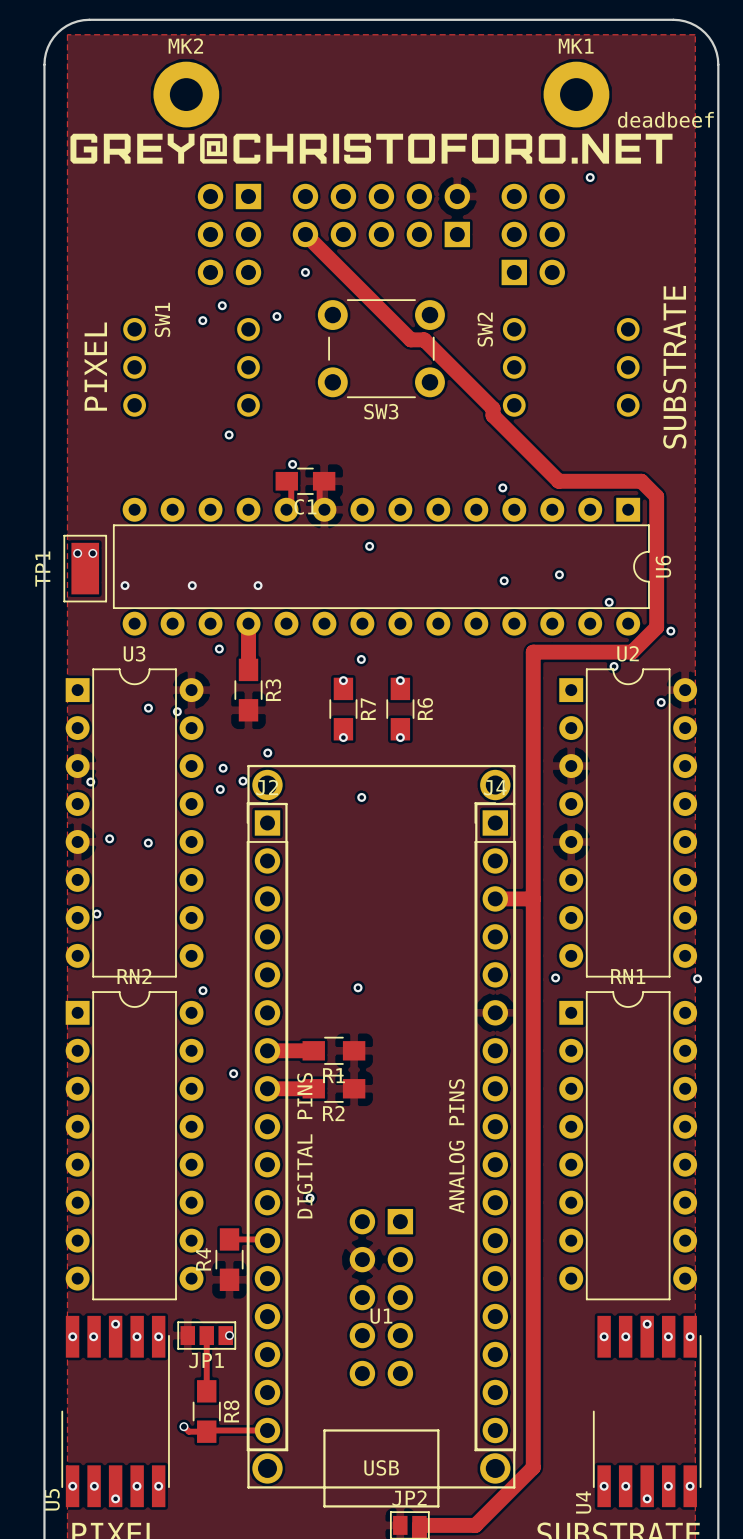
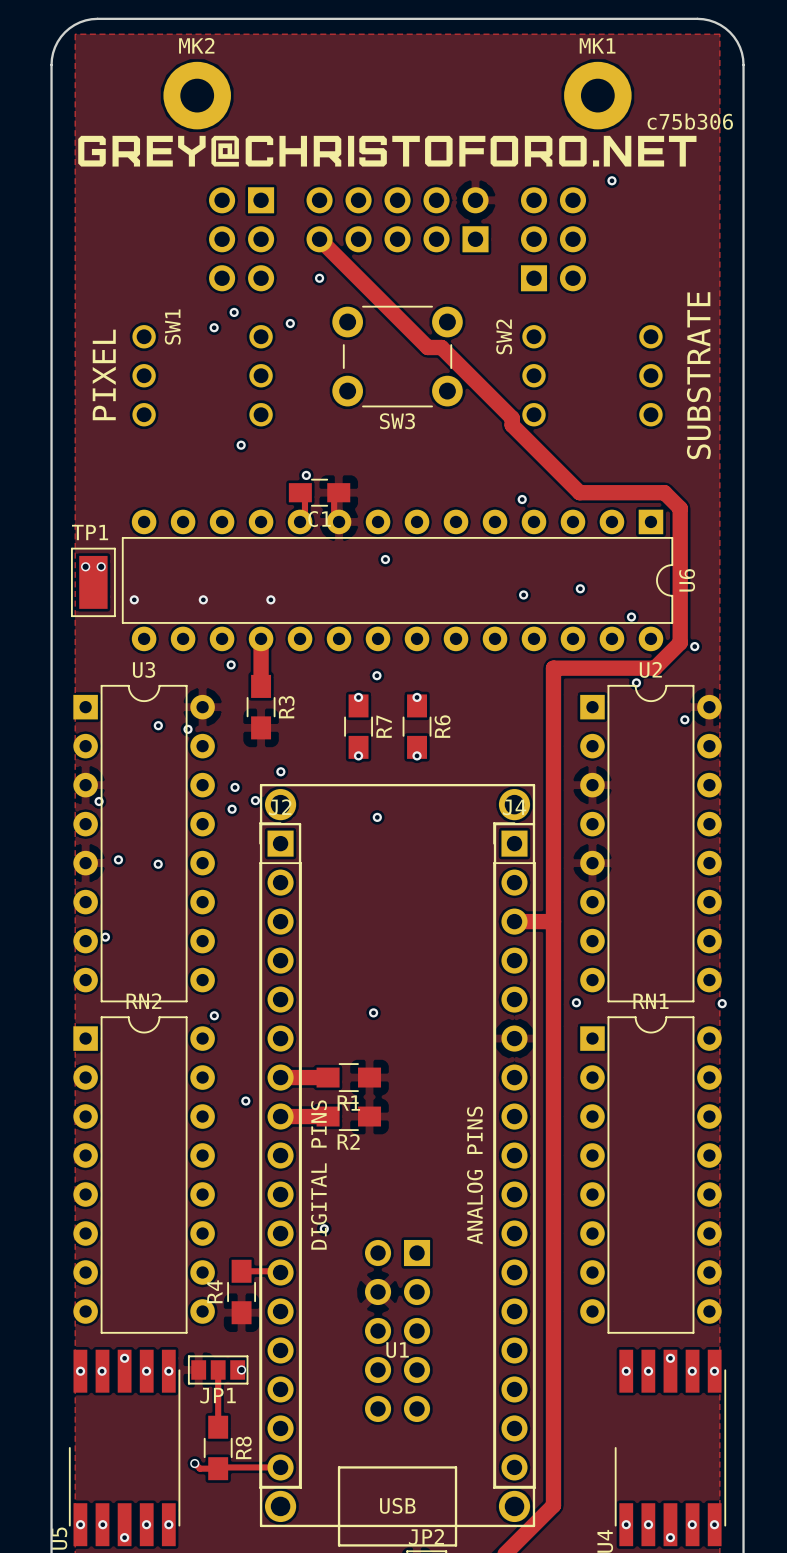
text: deadbeef (665, 119) -> c75b306 (690, 121)
TP1 name rotation: 0° (42, 569) -> 90° clockwise (90, 532)
TP1 name position: TP1 (42, 569) -> TP1 (90, 532)

